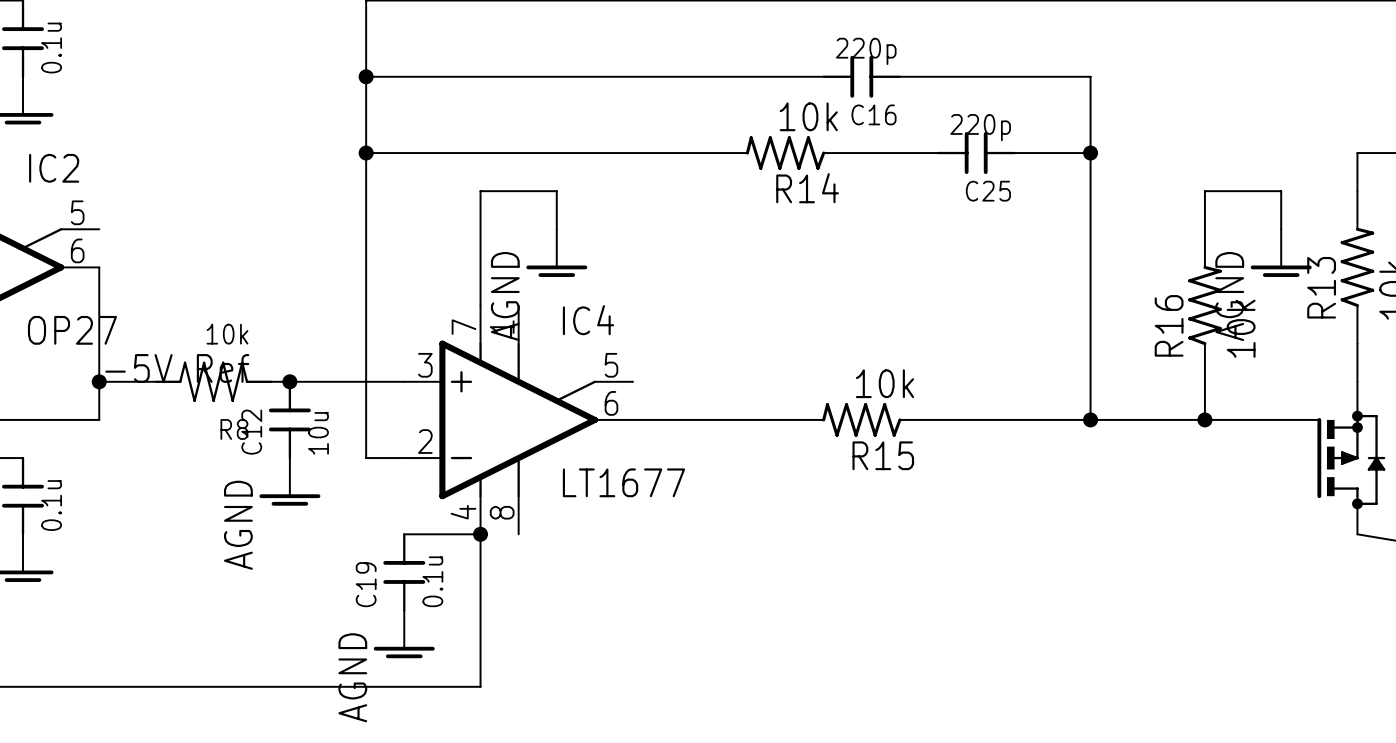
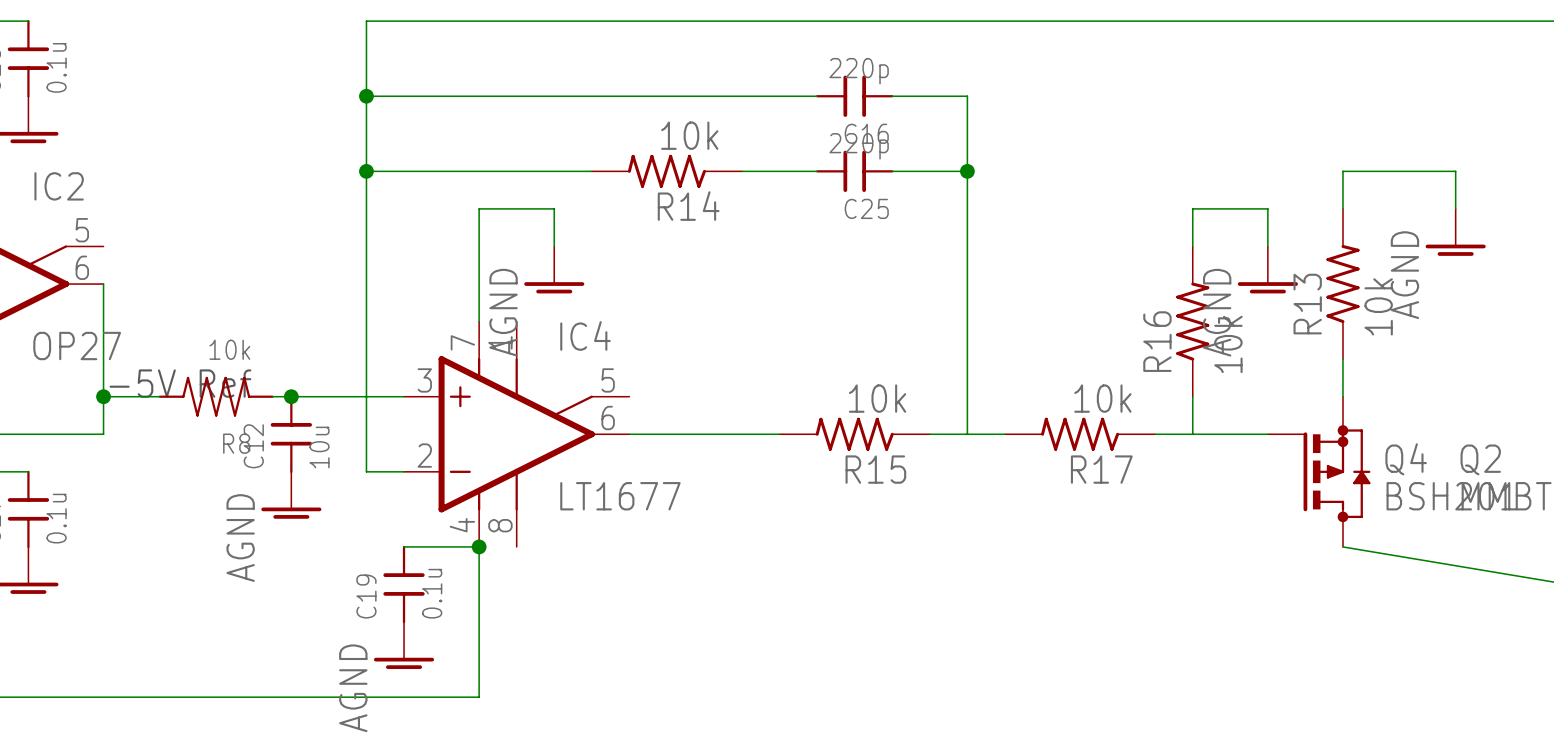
wire: (976, 76) (1090, 76) (1090, 419) -> (967, 96) (967, 434)
R14 position: (785, 153) -> (666, 171)
C25 position: (976, 153) -> (854, 171)
junction: none -> (967, 171)
wire: (1014, 153) (1090, 153) -> (742, 171) (817, 171)
junction: (1090, 153) -> none
R17: none -> 10k (1080, 434)
junction: (1090, 419) -> none
junction: (1204, 419) -> none

